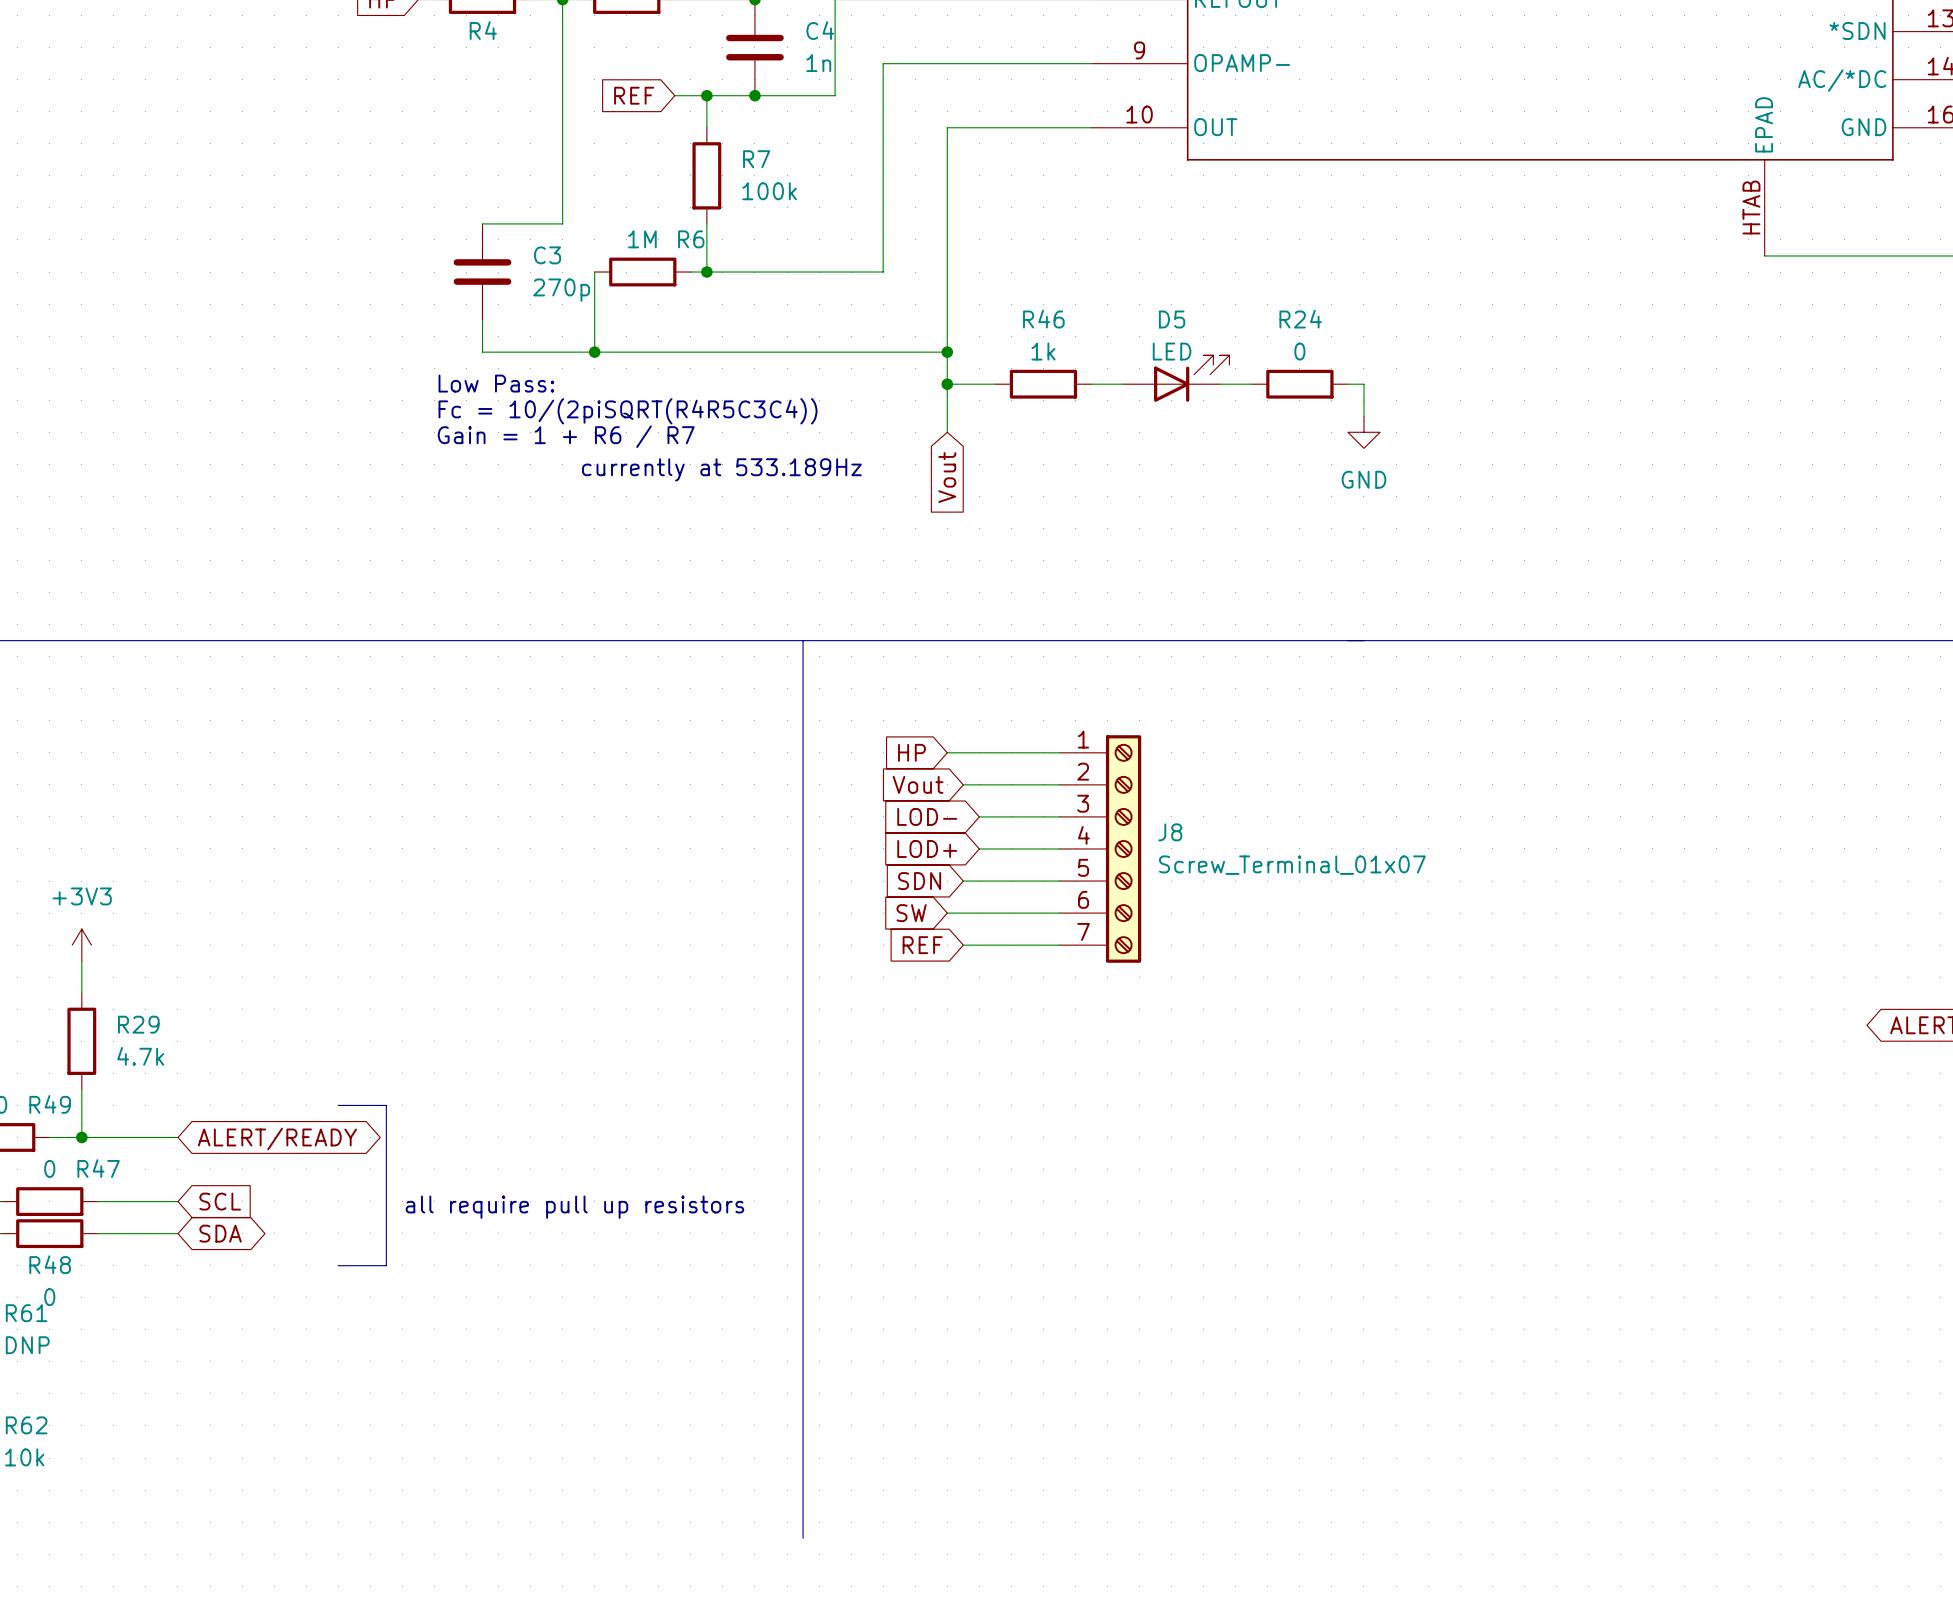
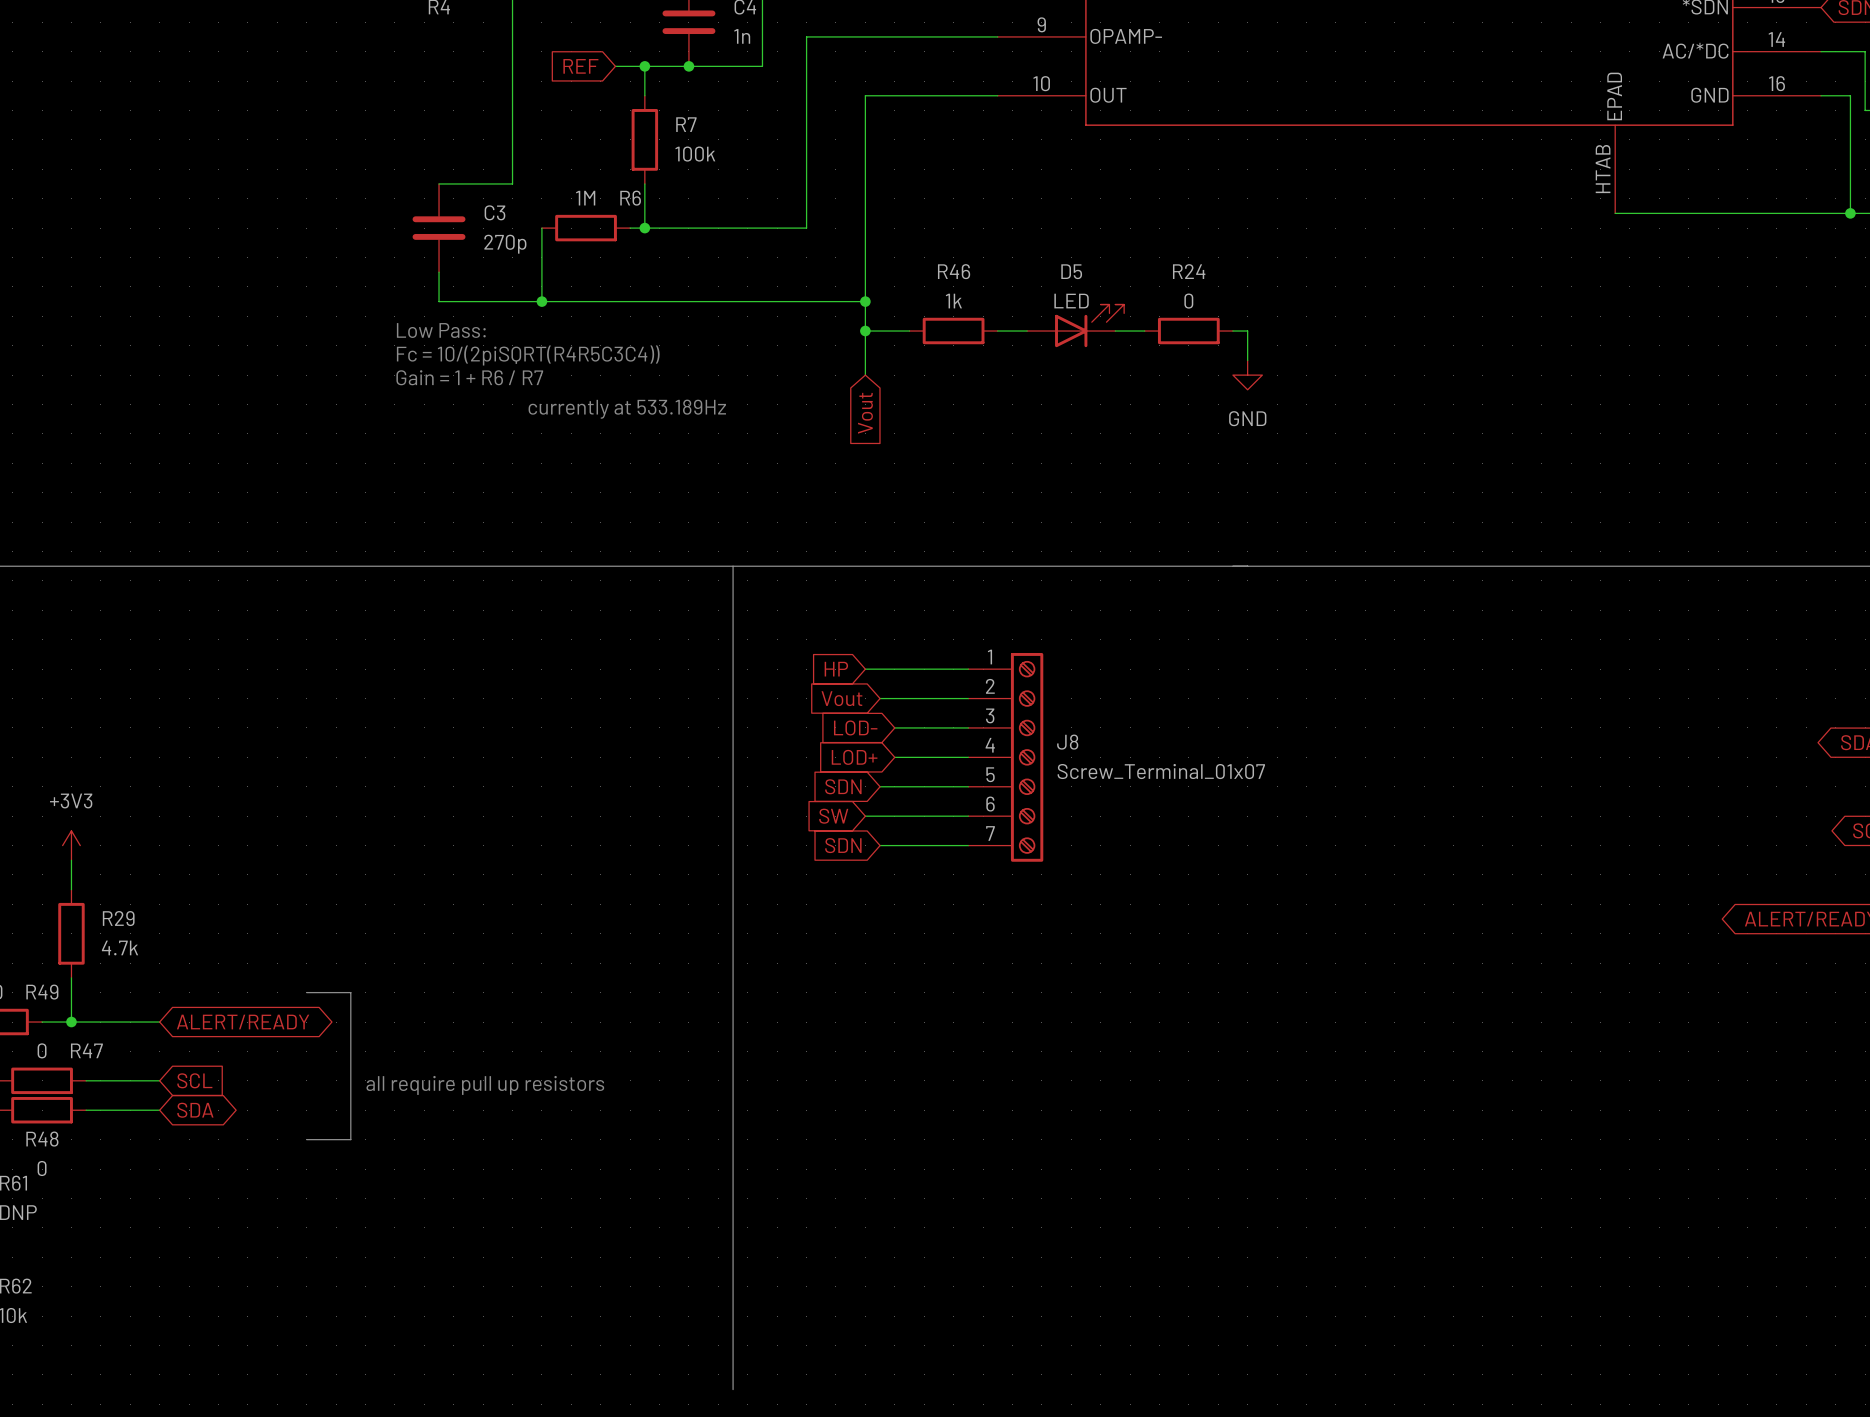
global label: REF (922, 945) -> SDN (843, 845)

